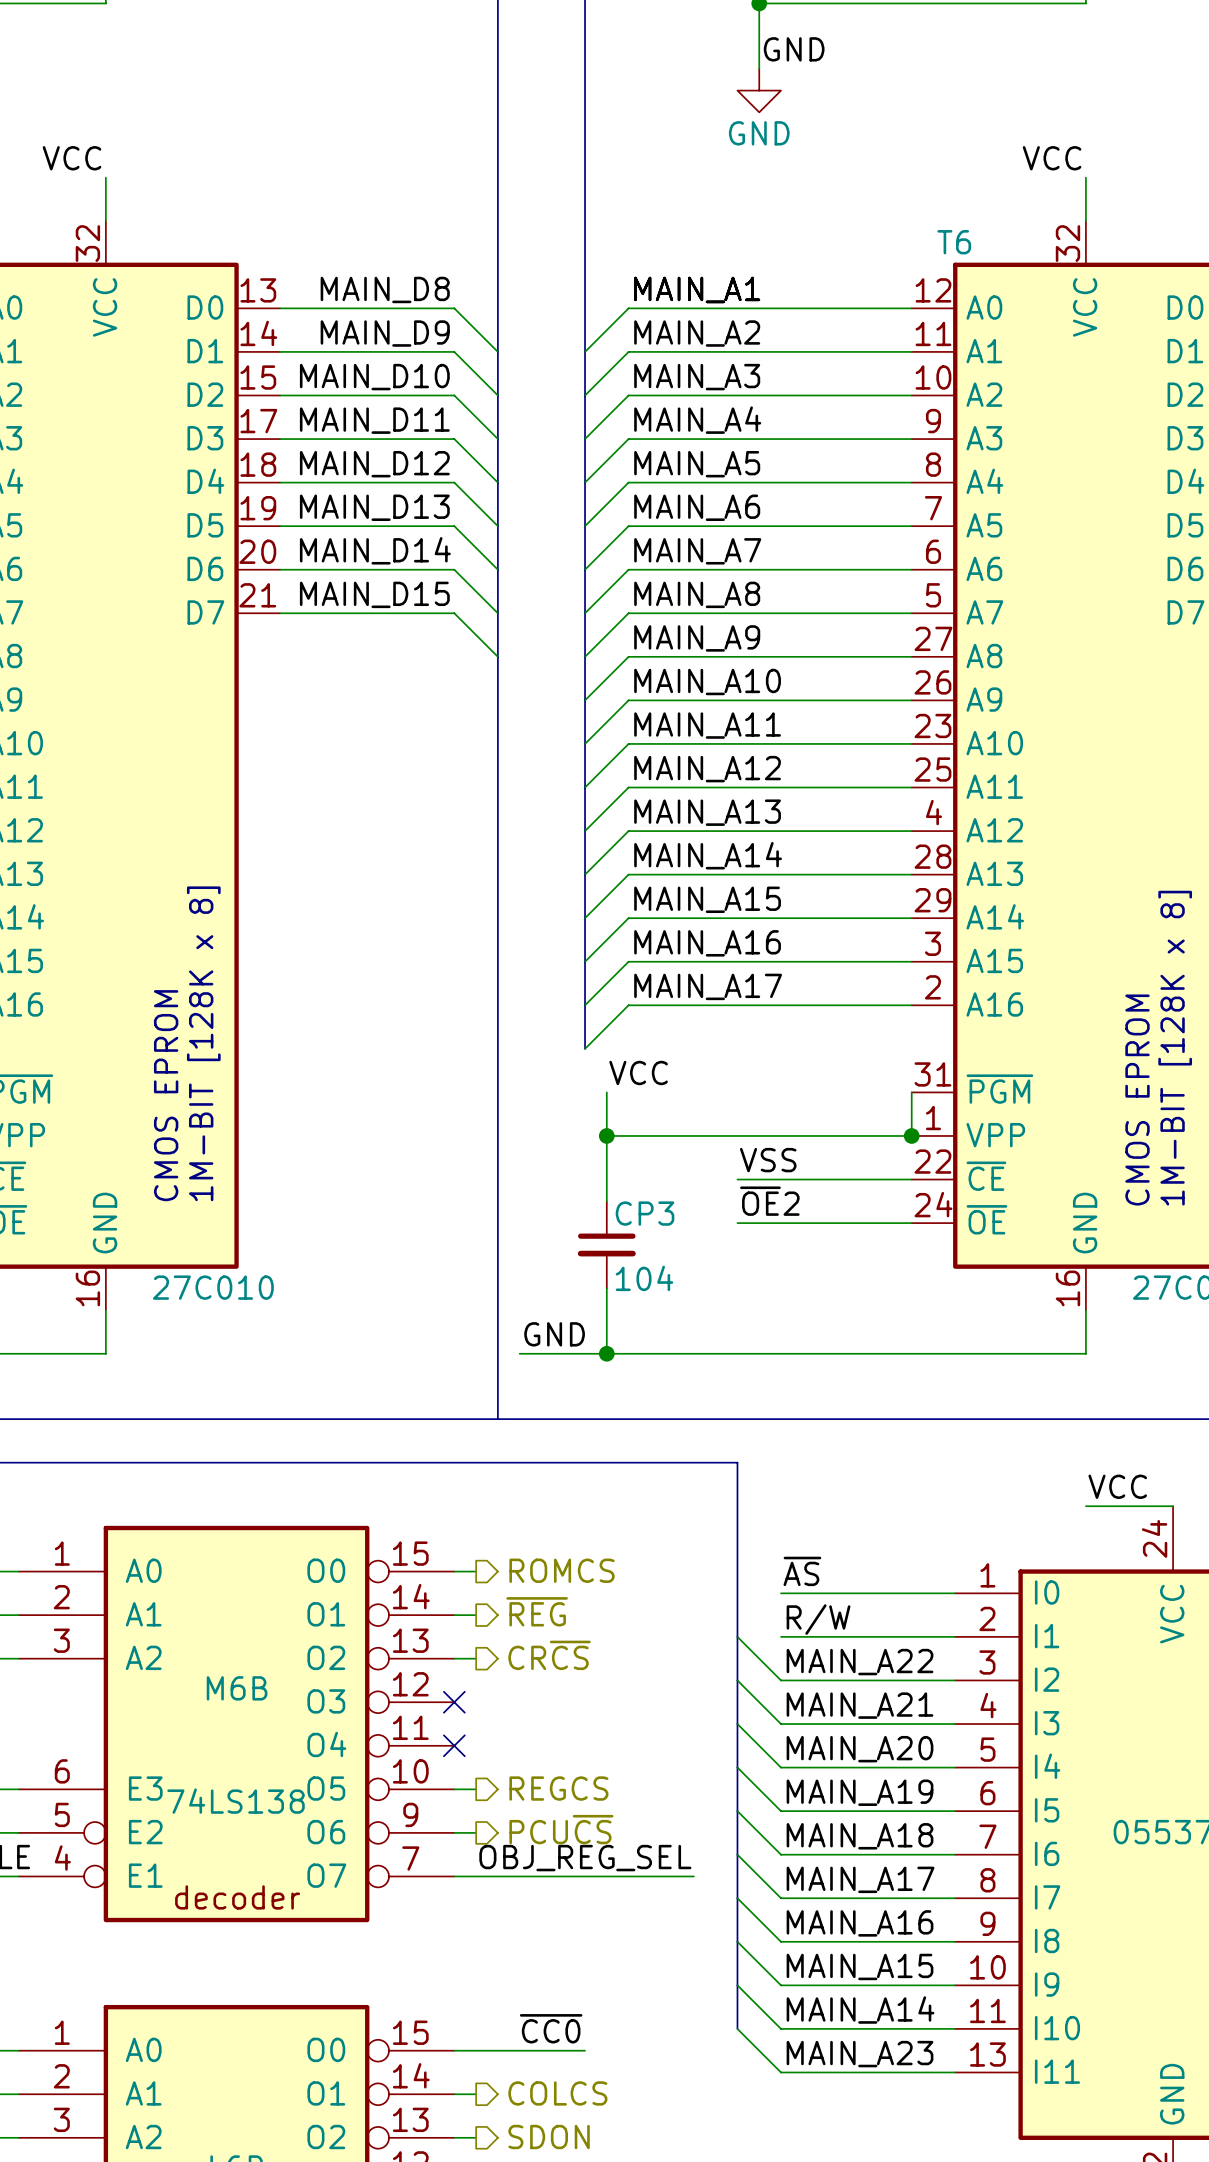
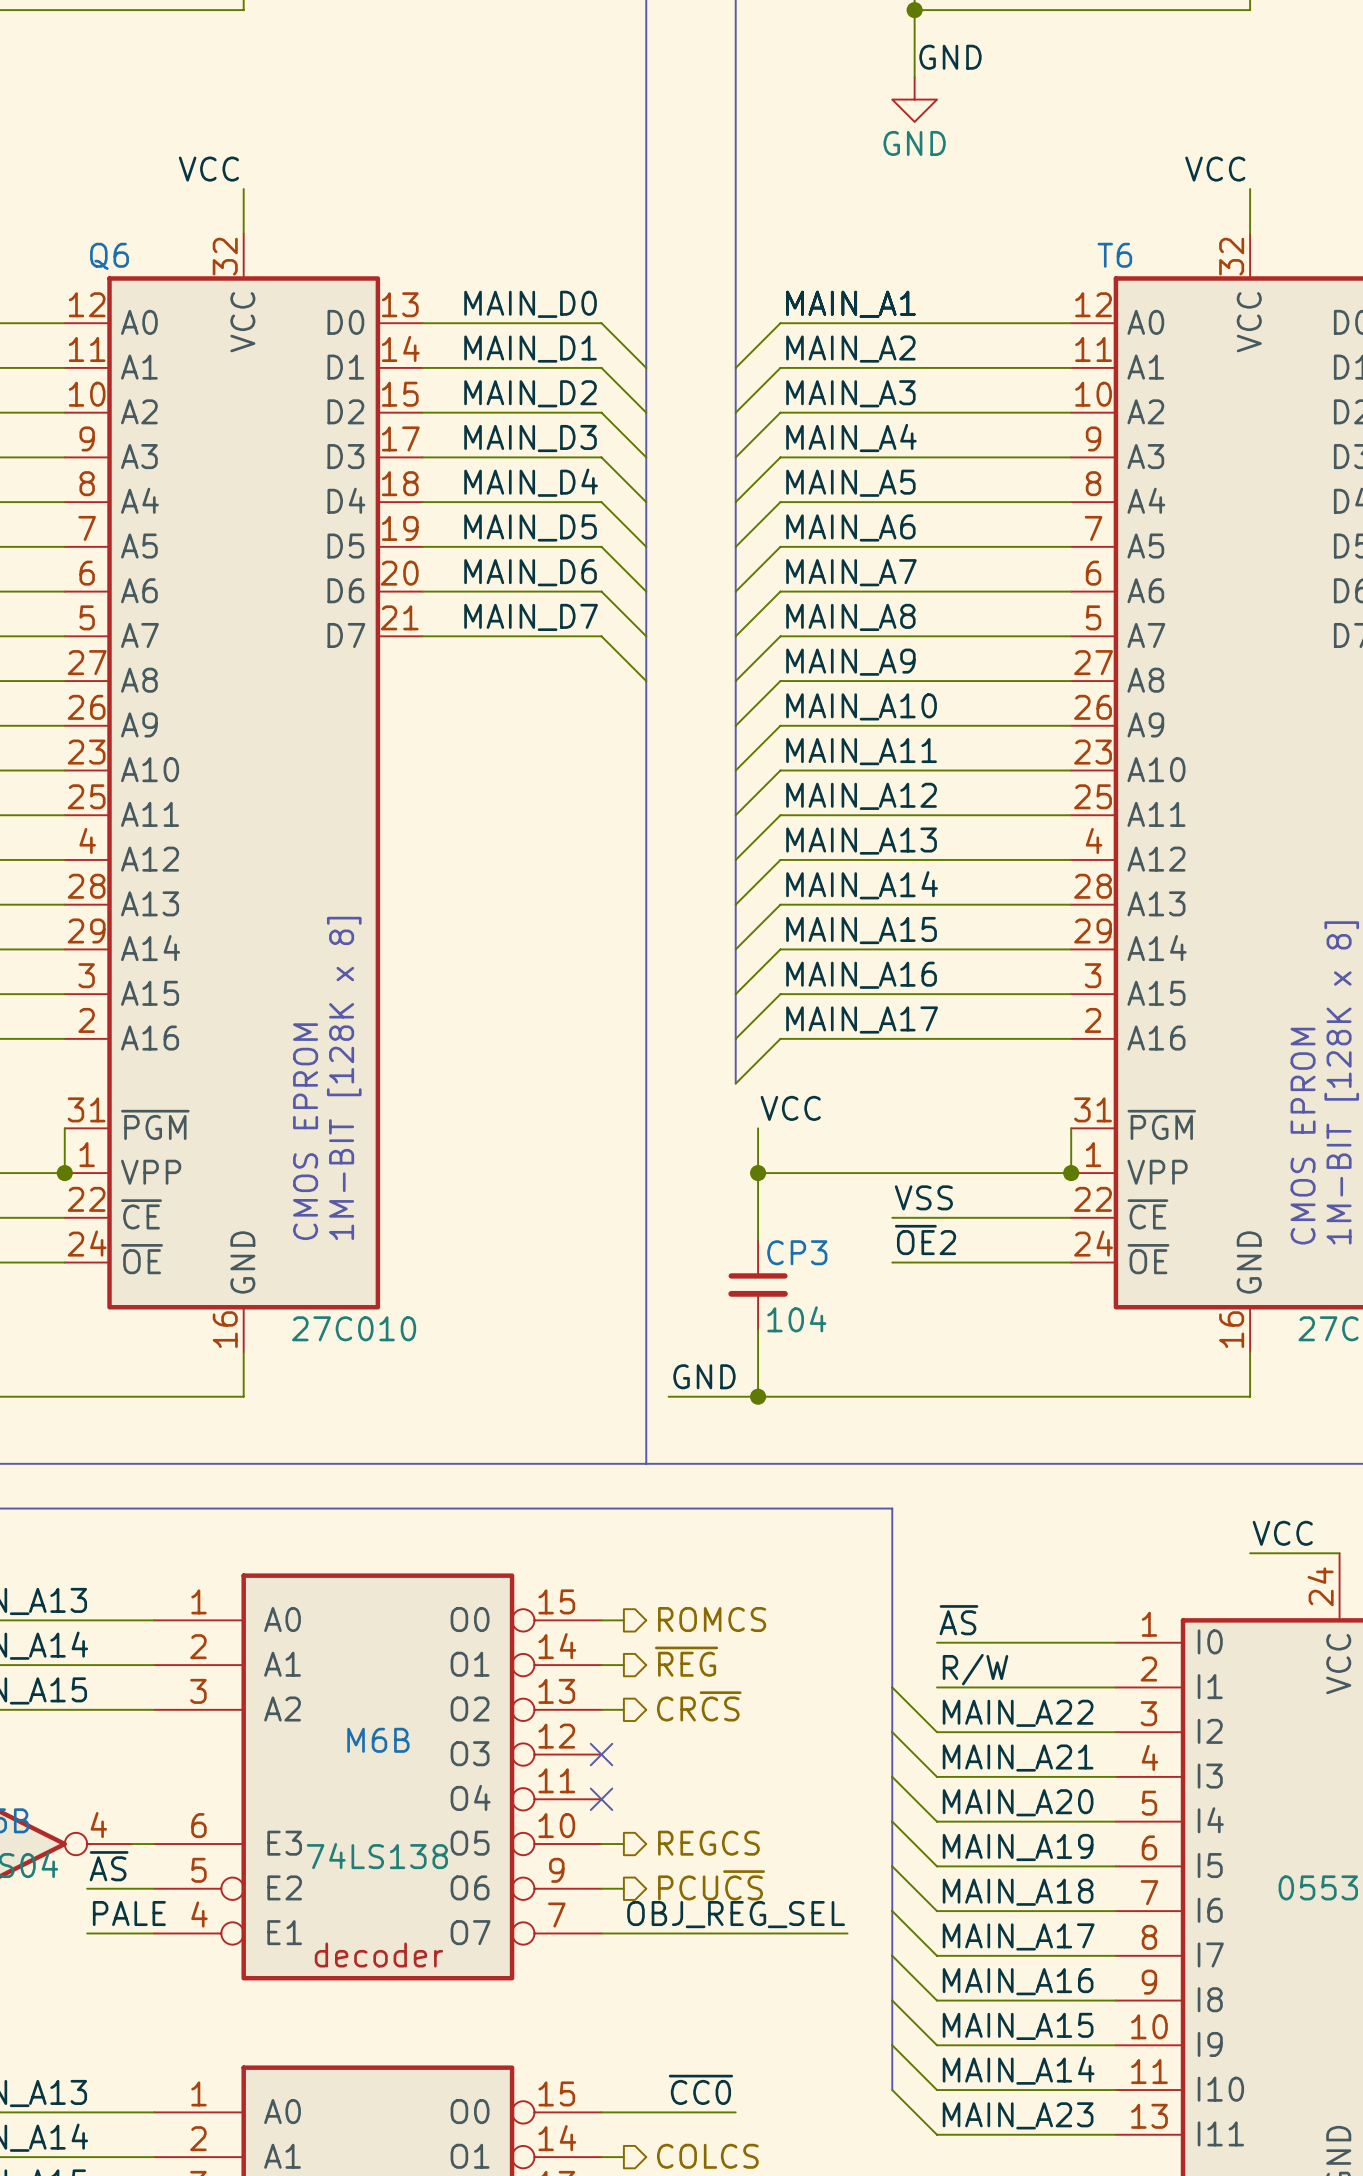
label: MAIN_D8 (385, 289) -> MAIN_D0 (530, 304)
label: MAIN_D9 (385, 333) -> MAIN_D1 (530, 349)
label: MAIN_D10 (374, 377) -> MAIN_D2 (530, 393)
label: MAIN_D11 (374, 420) -> MAIN_D3 (530, 438)
label: MAIN_D12 (374, 464) -> MAIN_D4 (531, 482)
label: MAIN_D13 (374, 507) -> MAIN_D5 (530, 527)
label: MAIN_D14 (375, 550) -> MAIN_D6 (530, 572)
label: MAIN_D15 (374, 594) -> MAIN_D7 (531, 617)

